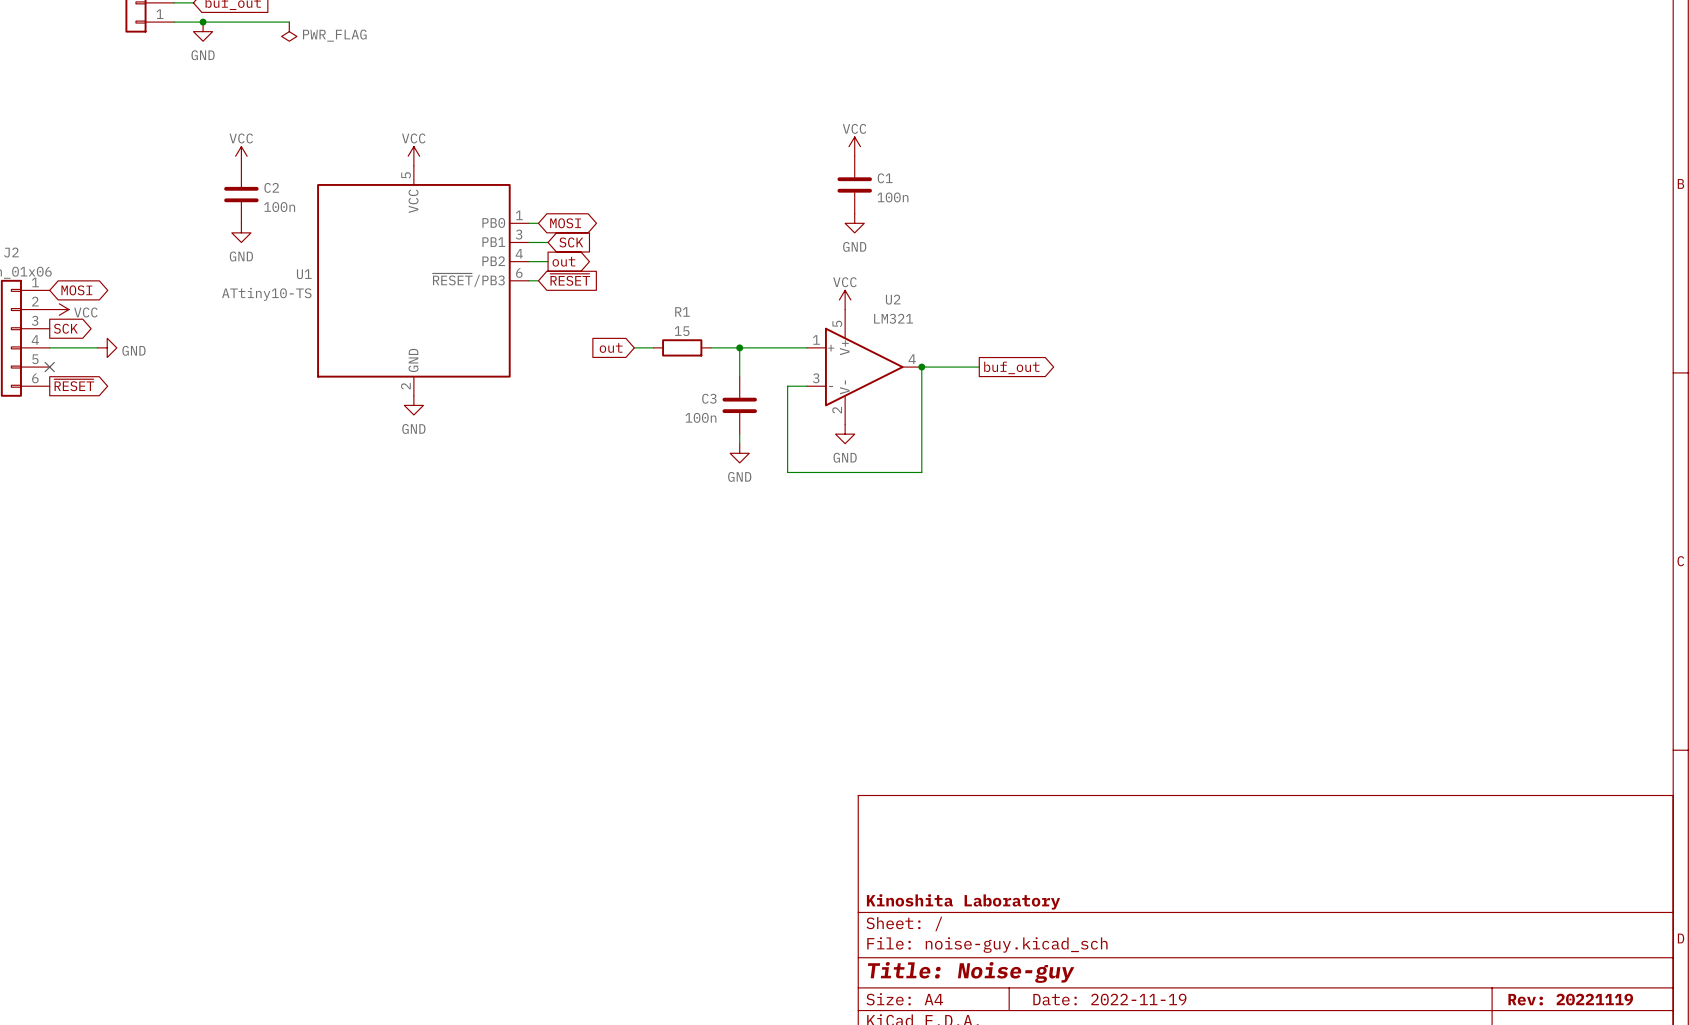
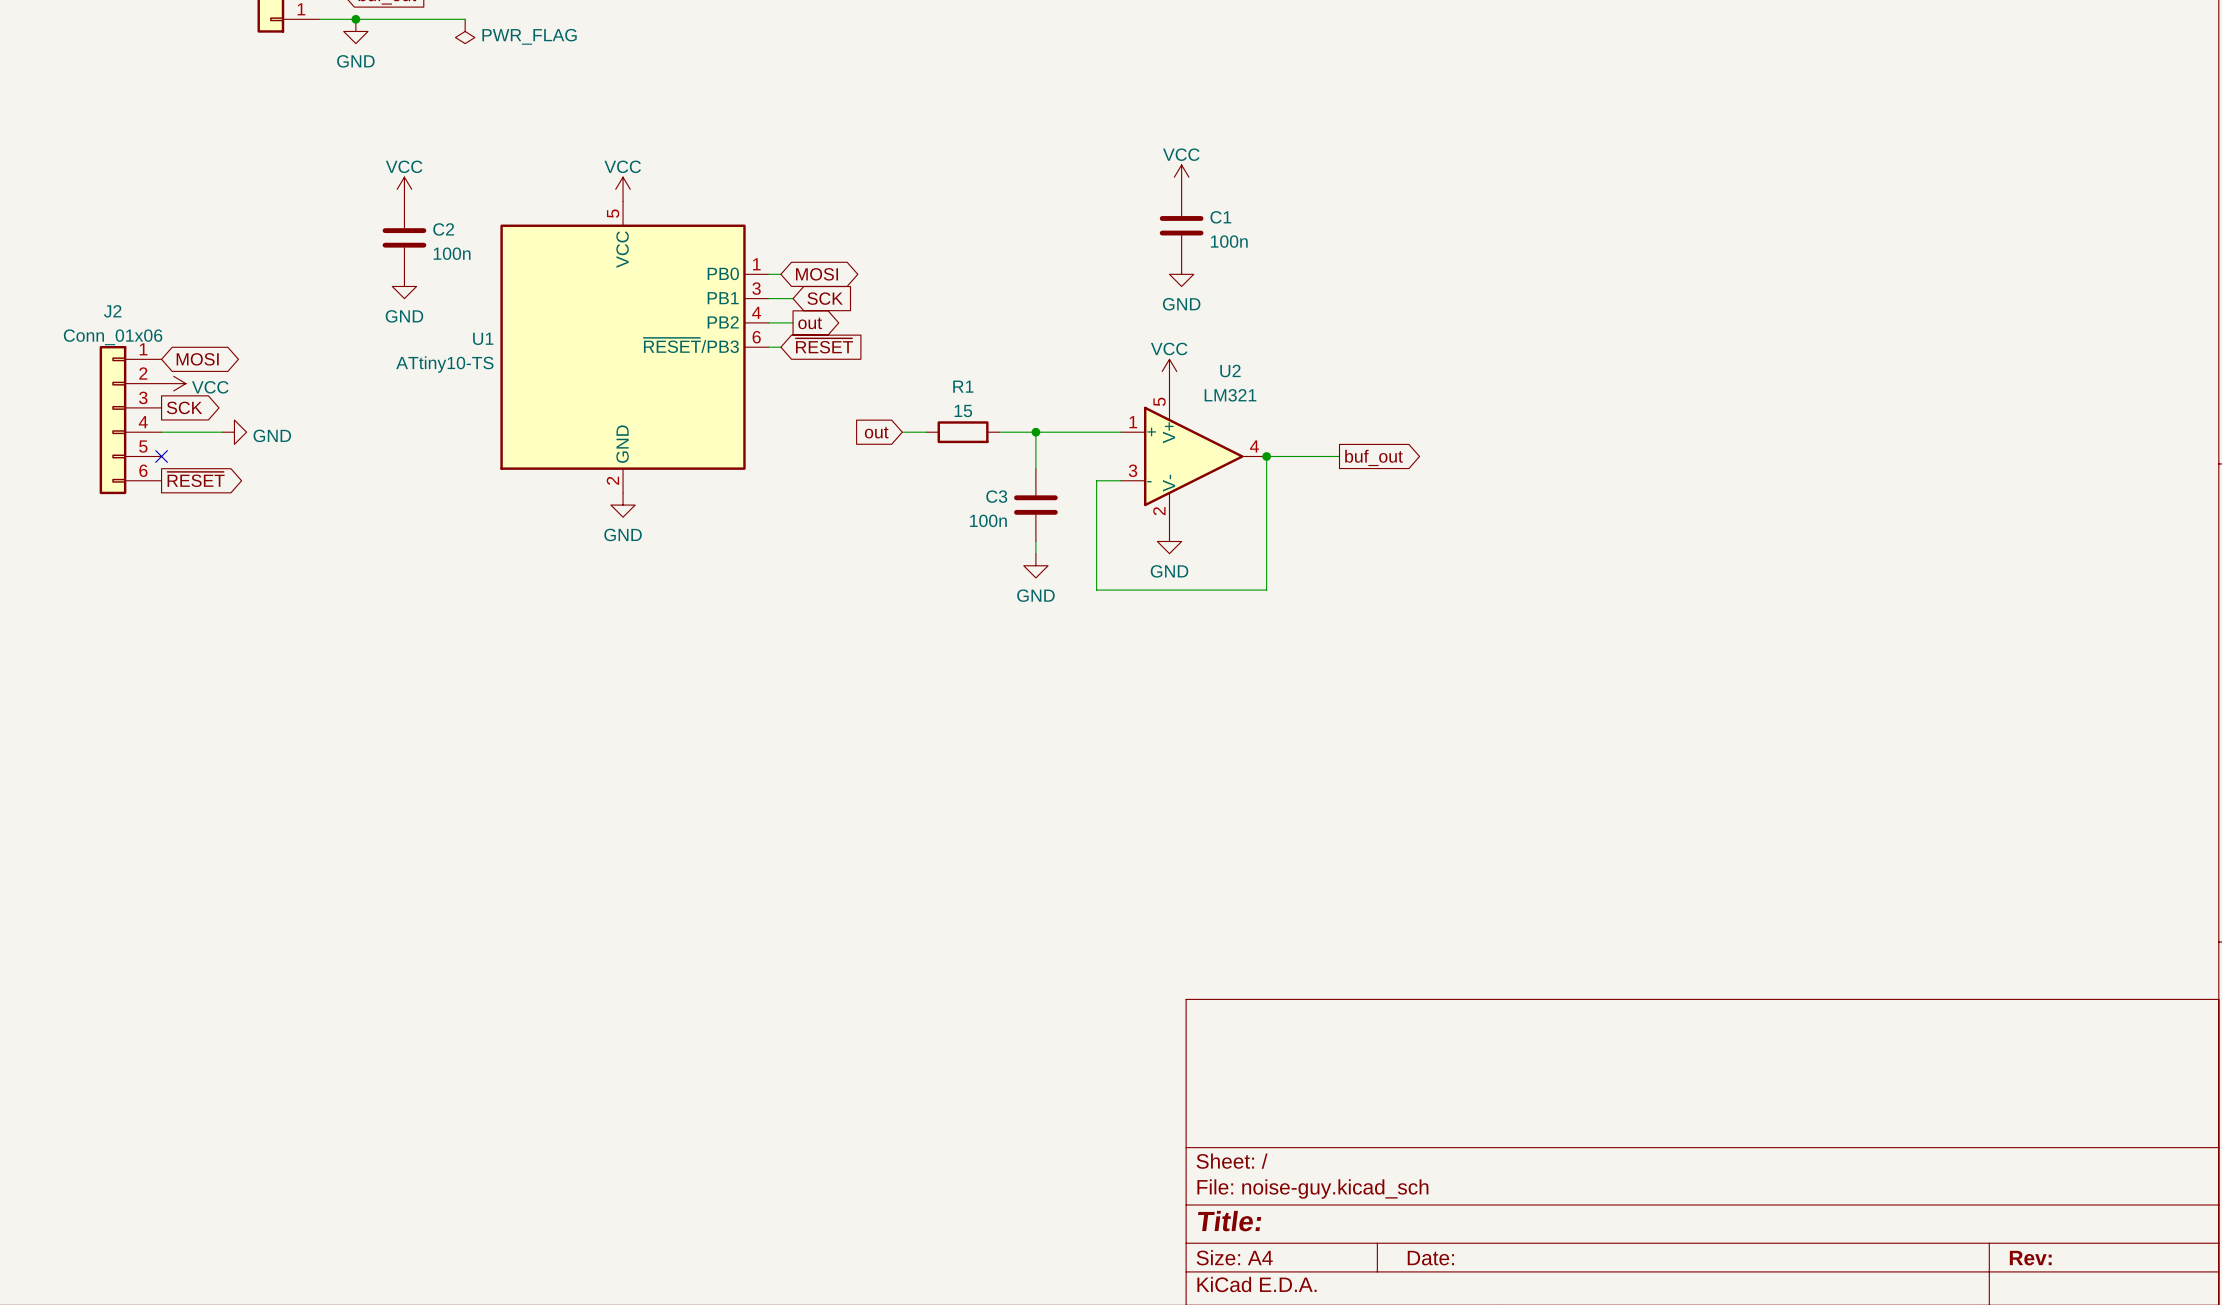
title block: Kinoshita Laboratory (963, 901) -> none
title block: Title: Noise-guy (971, 972) -> Title: (1229, 1221)
title block: Date: 2022-11-19 (1109, 999) -> Date: (1430, 1258)
title block: Rev: 20221119 (1570, 999) -> Rev: (2030, 1258)

